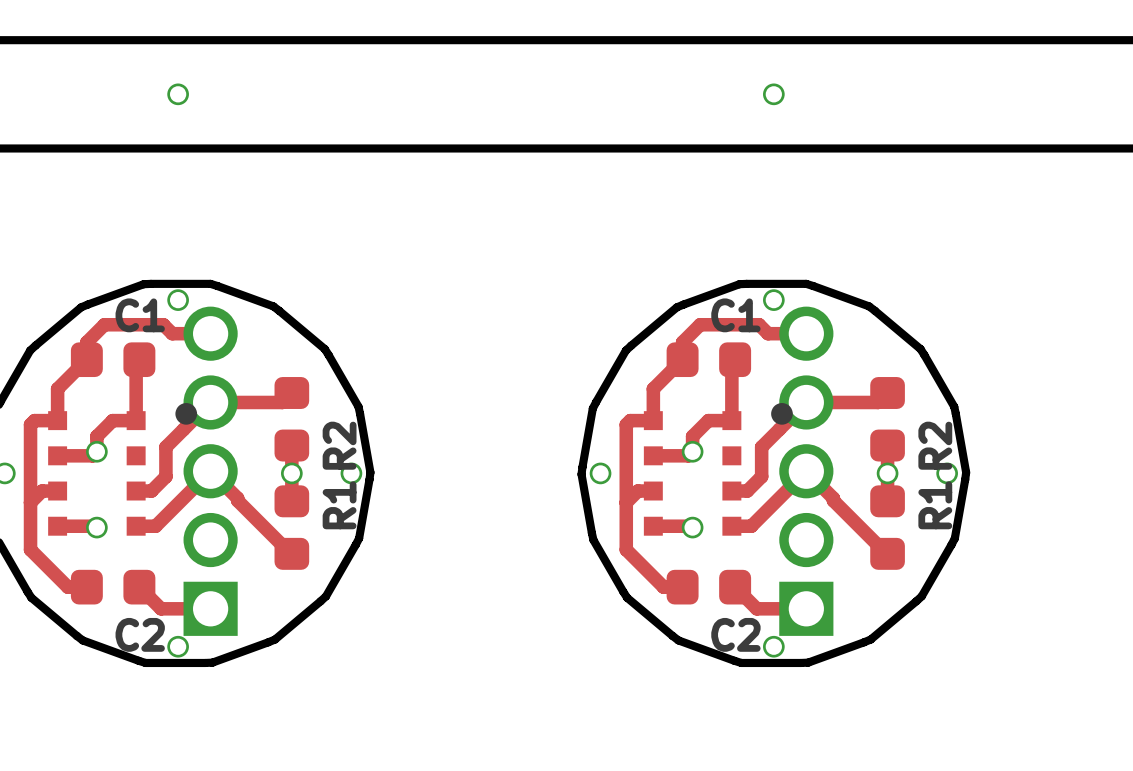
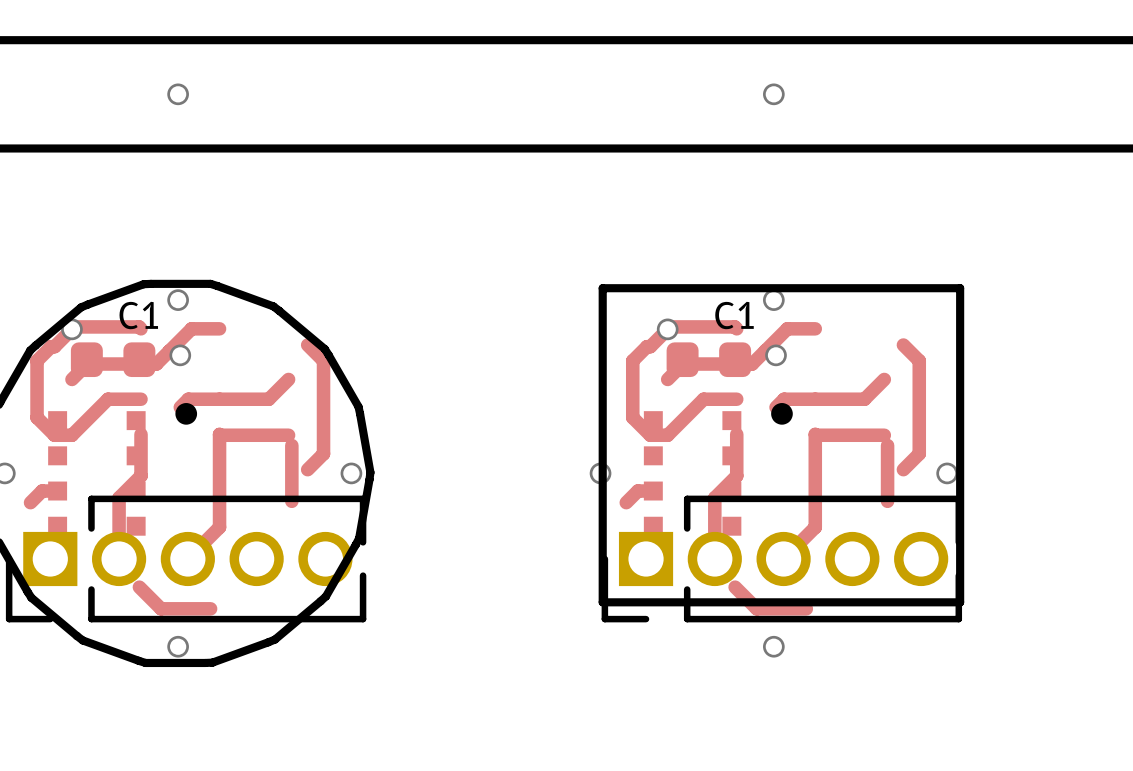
board edge: (746, 283) (806, 283) (869, 306) (920, 349) (954, 406) (966, 472) (954, 538) (921, 596) (870, 639) (808, 662) (741, 662) (678, 640) (672, 636) (627, 597) (593, 540) (581, 474) (592, 408) (625, 350) (676, 307) (739, 284) (746, 283) -> (602, 288) (602, 602) (960, 602) (960, 288) (602, 288)
track: none -> (141, 328) (139, 326) (71, 326) (71, 329) (54, 346) (51, 346) (37, 360) (37, 417) (54, 435) (71, 435) (107, 399) (141, 399)
track: none -> (219, 328) (191, 328) (156, 364) (87, 364) (71, 379)
track: none -> (736, 328) (734, 326) (667, 326) (667, 329) (650, 346) (646, 346) (632, 360) (632, 417) (650, 435) (667, 435) (703, 399) (736, 399)
track: none -> (815, 328) (787, 328) (752, 364) (683, 364) (667, 379)
via: none -> (71, 329)
via: none -> (667, 329)
track: (210, 333) (172, 333) (163, 324) (104, 324) (86, 342) (86, 359) (57, 388) (57, 420) (34, 420) (30, 424) (30, 549) (67, 587) (86, 587) -> none
track: (806, 333) (768, 333) (759, 324) (700, 324) (682, 342) (682, 359) (653, 388) (653, 420) (630, 420) (626, 424) (626, 549) (663, 587) (682, 587) -> none
track: none -> (307, 345) (323, 360) (323, 453) (307, 469)
track: none -> (903, 345) (919, 360) (919, 453) (903, 469)
via: none -> (180, 355)
via: none -> (776, 355)
track: (139, 359) (136, 362) (136, 420) (112, 420) (96, 436) (96, 451) (92, 455) (57, 455) -> none
track: (735, 359) (731, 362) (731, 420) (708, 420) (692, 436) (692, 451) (688, 455) (653, 455) -> none
track: none -> (288, 379) (268, 399) (188, 399) (180, 407)
track: none -> (884, 379) (864, 399) (784, 399) (776, 407)
track: (291, 393) (282, 402) (210, 402) (165, 447) (165, 476) (151, 491) (136, 491) -> none
track: (887, 393) (878, 402) (806, 402) (761, 447) (761, 476) (747, 491) (731, 491) -> none
R2: (291, 419) -> none
R2: (887, 419) -> none
track: none -> (141, 434) (141, 475) (119, 497) (119, 558)
track: none -> (736, 434) (736, 475) (714, 497) (714, 558)
track: none -> (288, 435) (219, 434) (219, 527) (187, 558)
track: none -> (884, 435) (815, 434) (815, 527) (783, 558)
via: (96, 451) -> none
via: (692, 451) -> none
part side: bottom (210, 471) -> top (186, 558)
part side: bottom (806, 471) -> top (781, 558)
via: (291, 473) -> none
via: (887, 473) -> none
track: (57, 526) (96, 527) -> none
track: (136, 526) (155, 526) (210, 471) (290, 553) -> none
track: (653, 526) (692, 527) -> none
track: (731, 526) (751, 526) (806, 471) (886, 553) -> none
via: (96, 527) -> none
R1: (291, 527) -> none
via: (692, 527) -> none
R1: (887, 527) -> none
C2: (113, 587) -> none
C2: (708, 587) -> none

